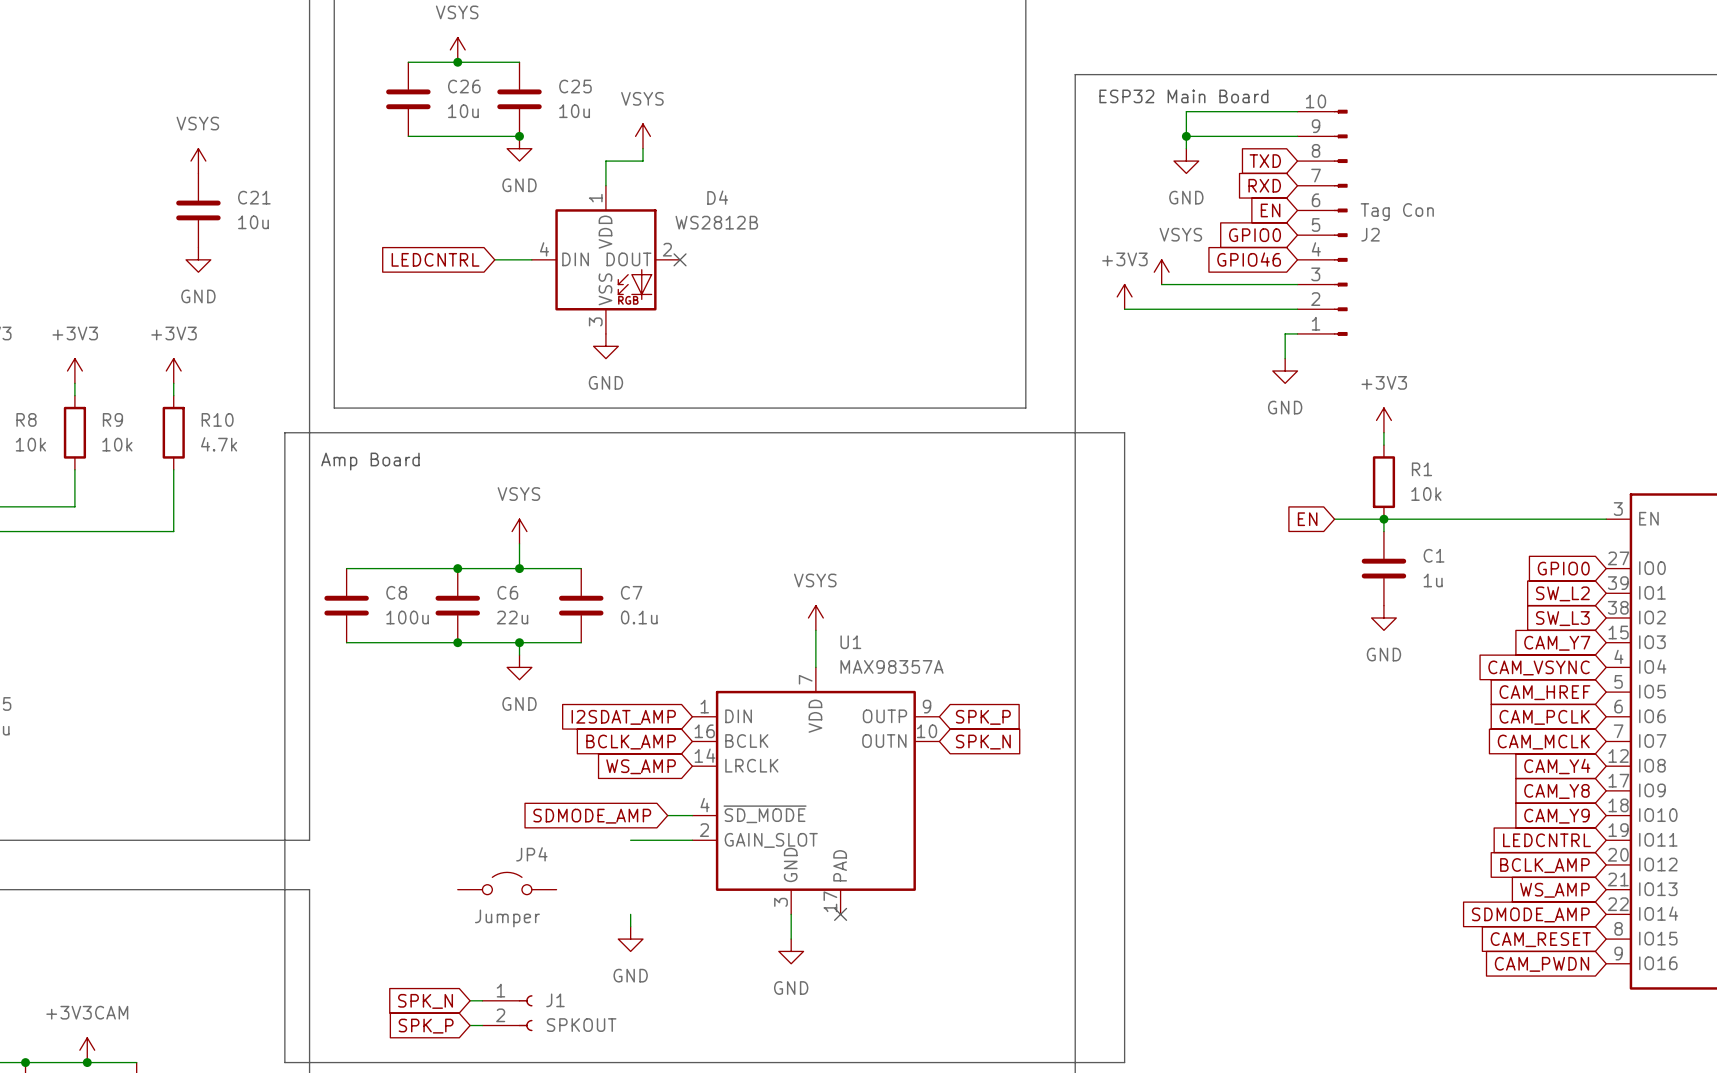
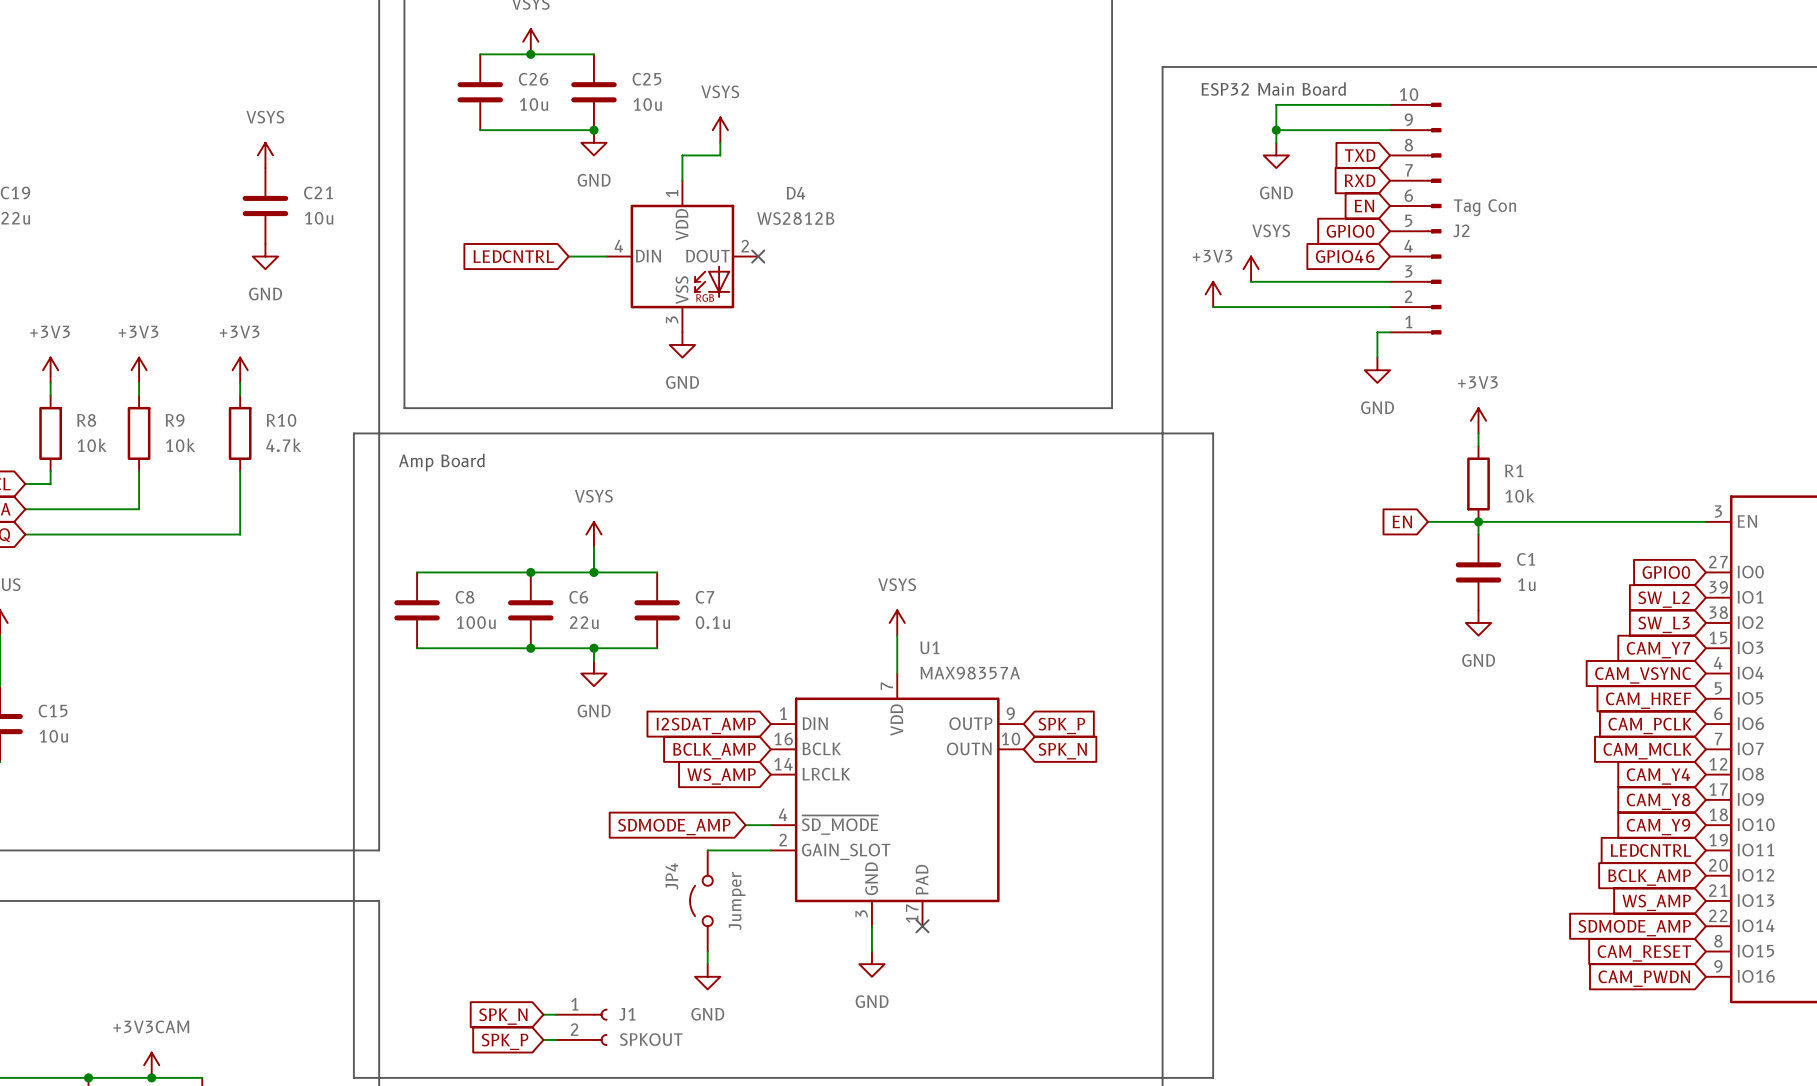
JP4 rotation: 0° (507, 883) -> 90° counterclockwise (701, 900)
JP4 position: (507, 883) -> (701, 900)
power symbol position: GND (630, 939) -> GND (707, 976)

